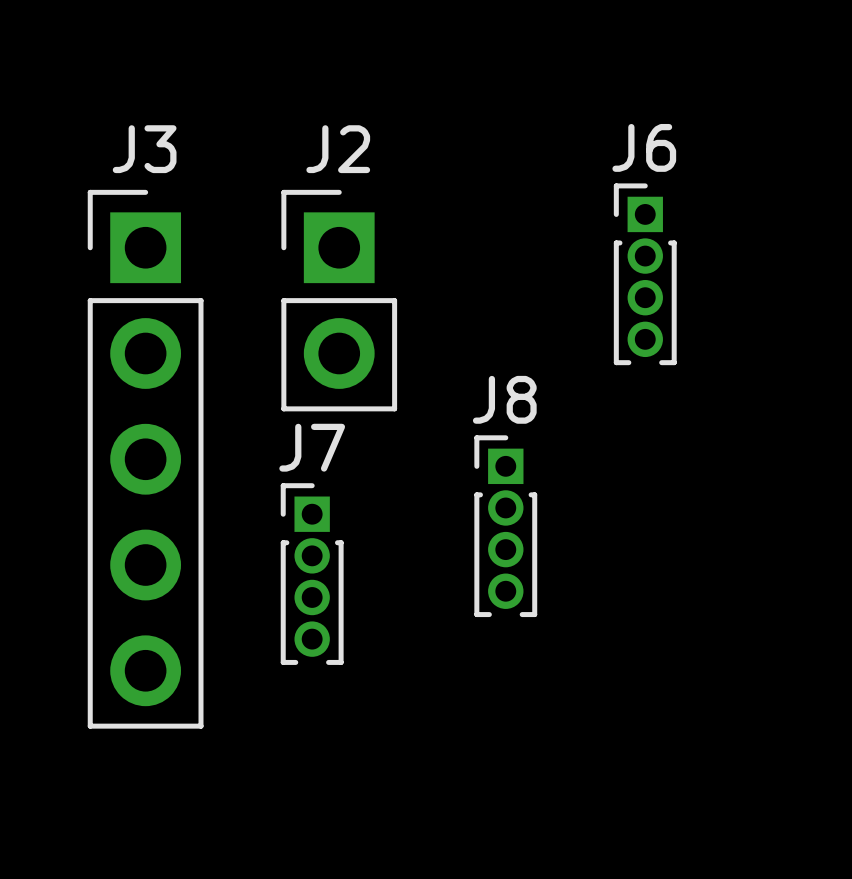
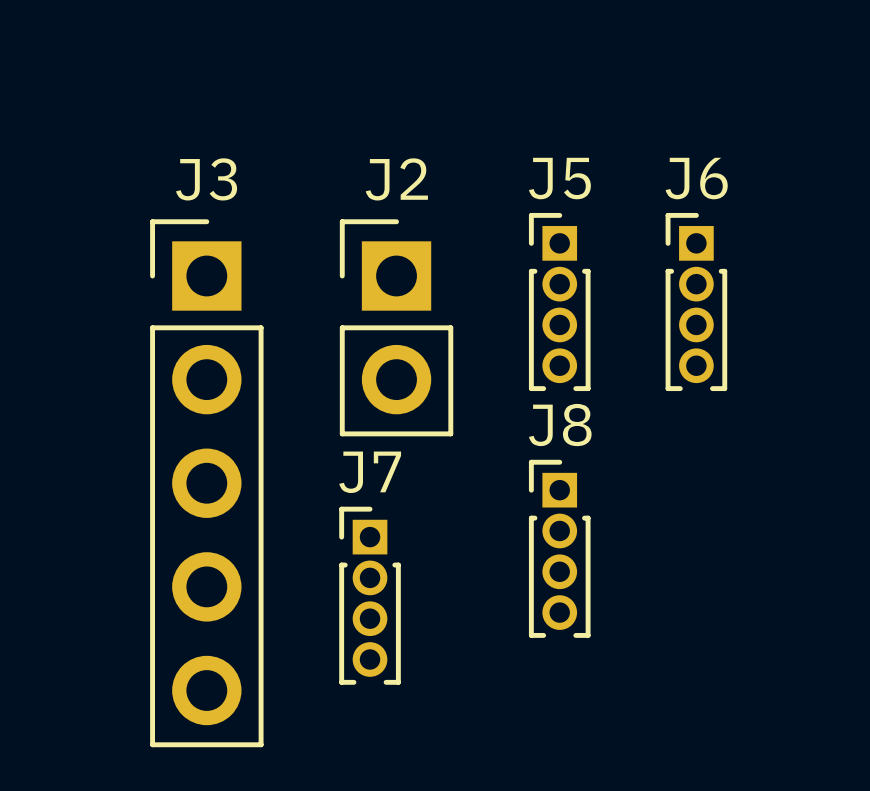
J5: none -> (559, 302)

